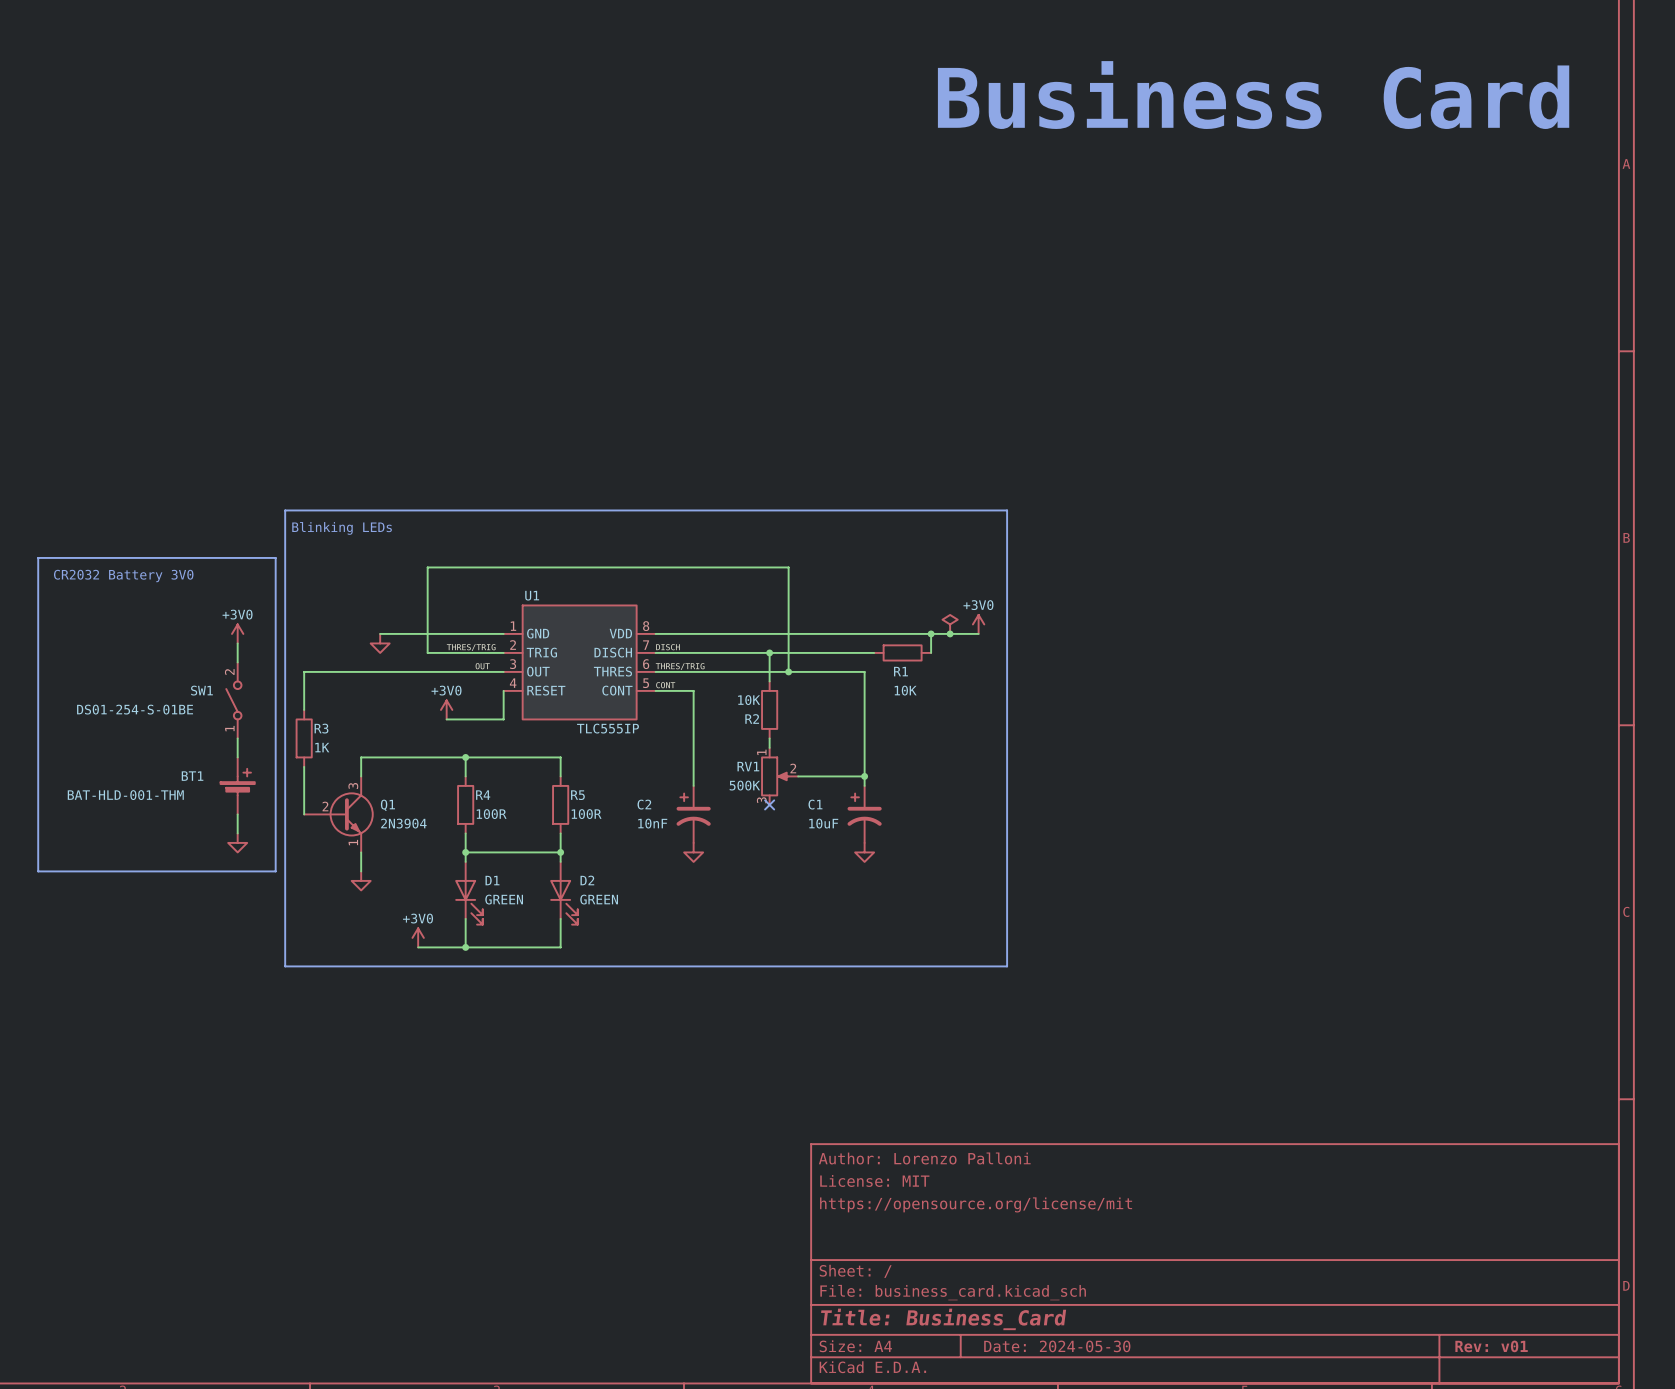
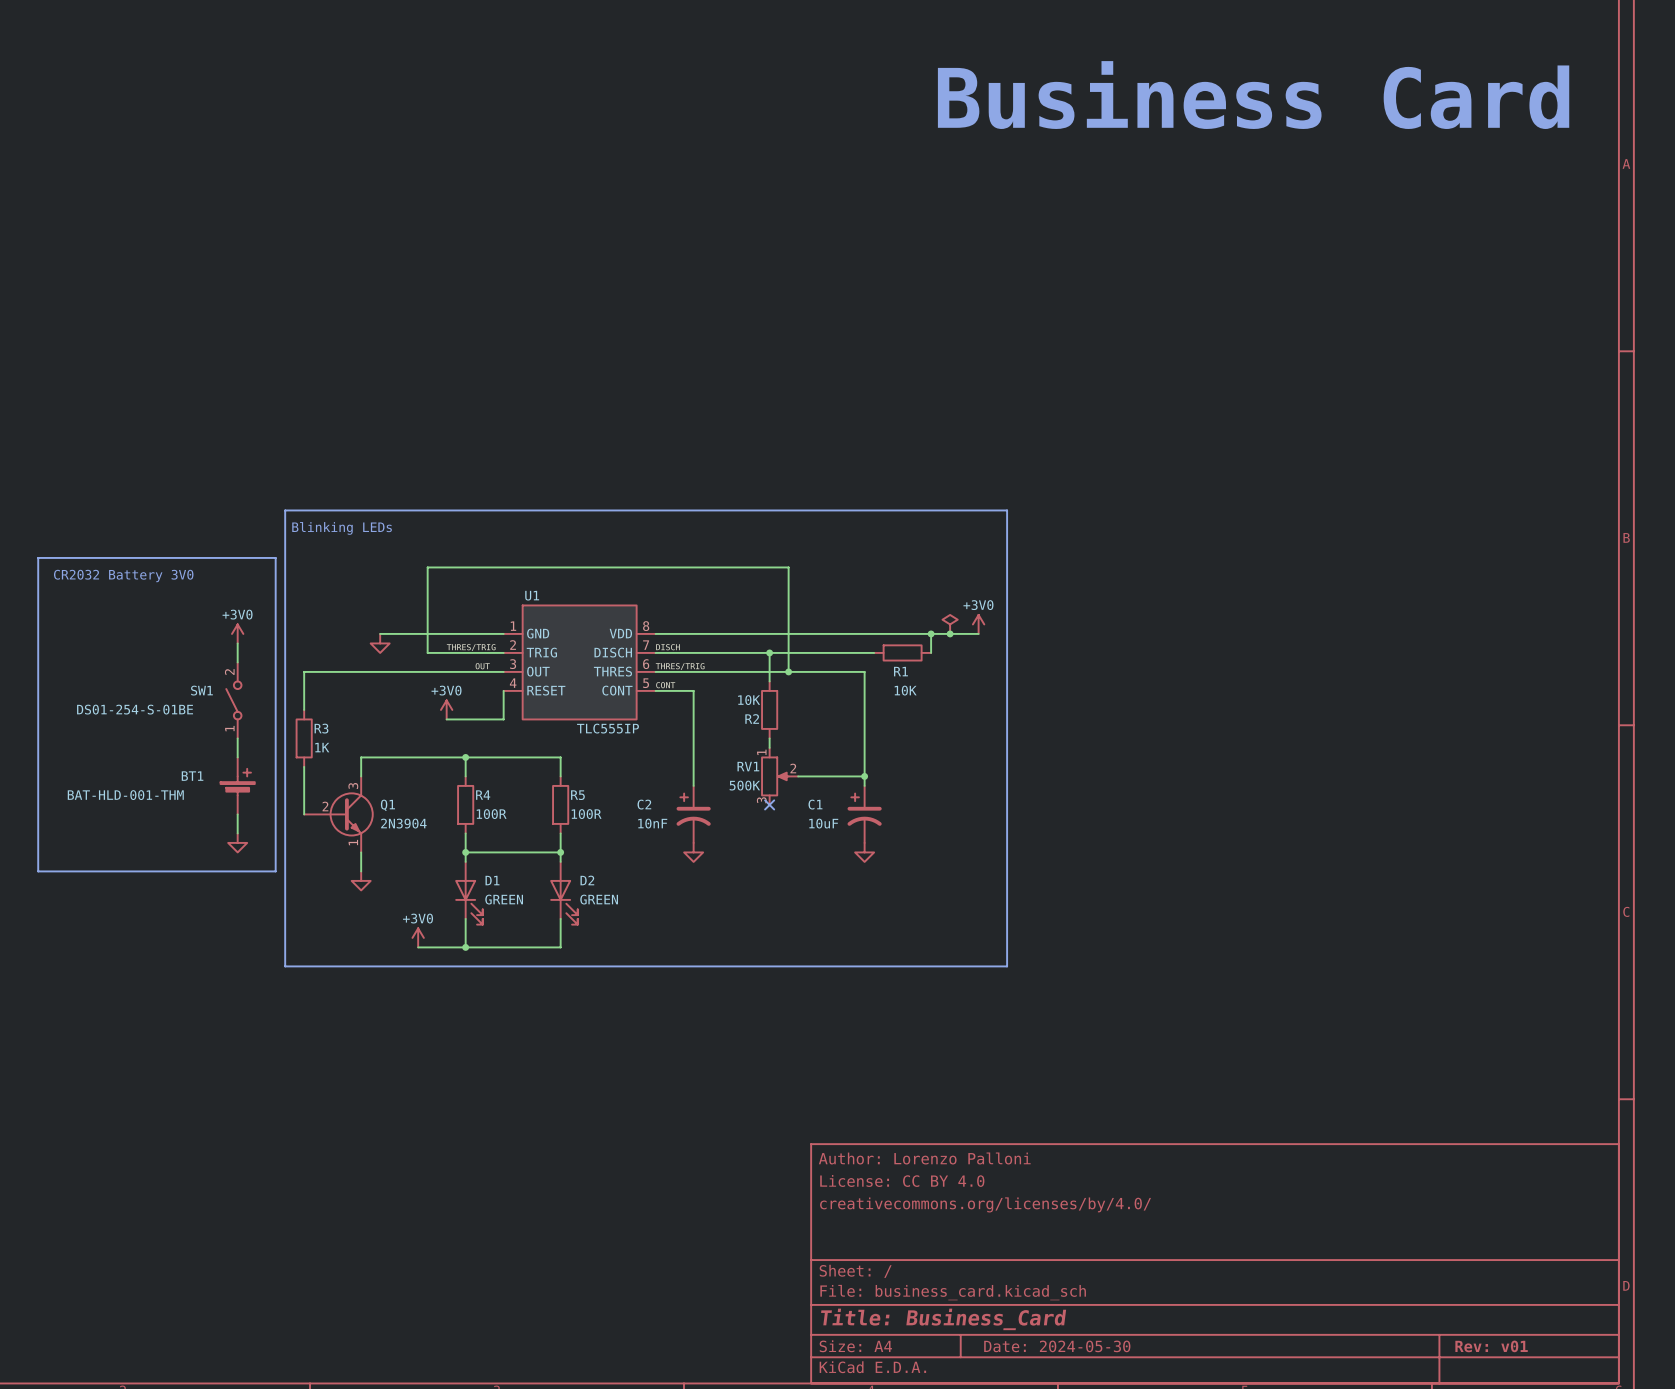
title block: License: MIT (874, 1180) -> License: CC BY 4.0 (902, 1180)
title block: https://opensource.org/license/mit (976, 1204) -> creativecommons.org/licenses/by/4.0/ (985, 1204)

